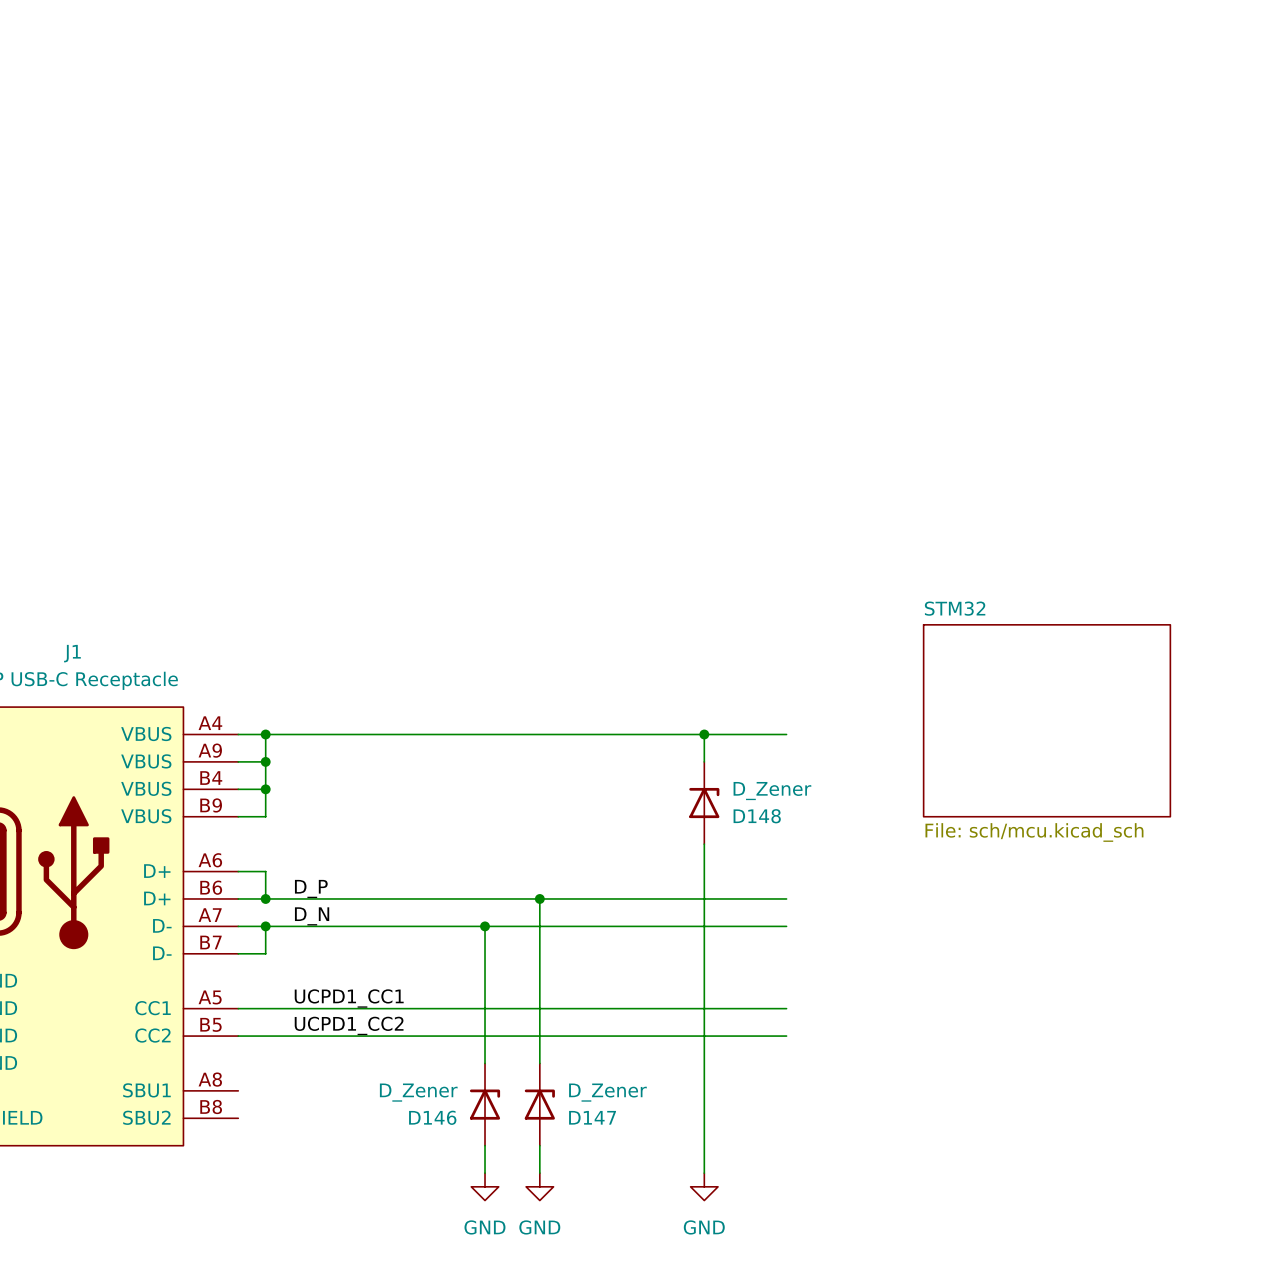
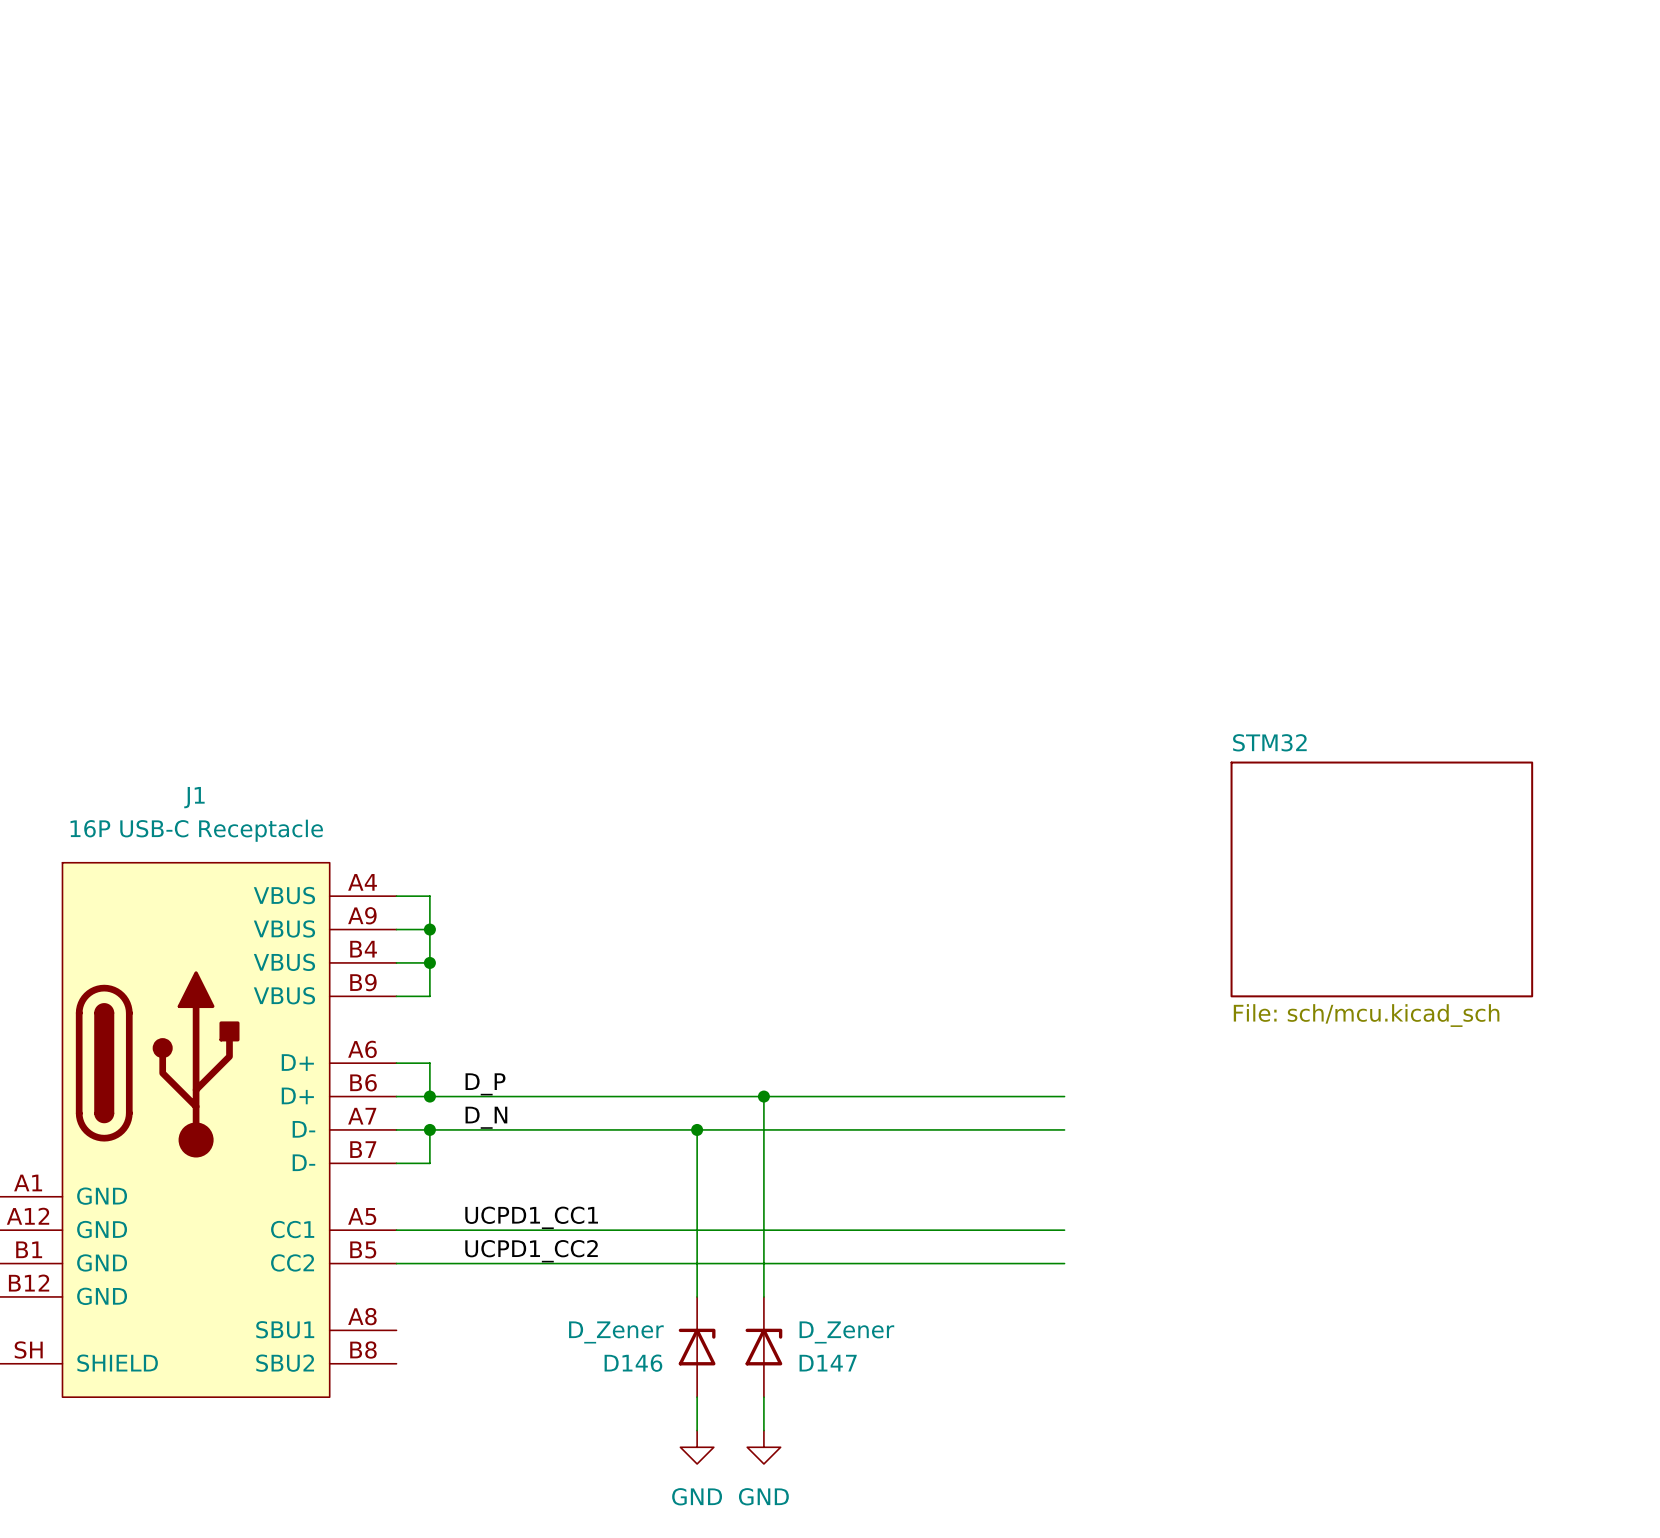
wire: (265, 734) (786, 734) -> none
junction: (265, 734) -> none
wire: (704, 734) (704, 761) -> none
junction: (704, 734) -> none
D148: D_Zener (704, 803) -> none
wire: (704, 844) (704, 1173) -> none
power symbol: GND (704, 1186) -> none

